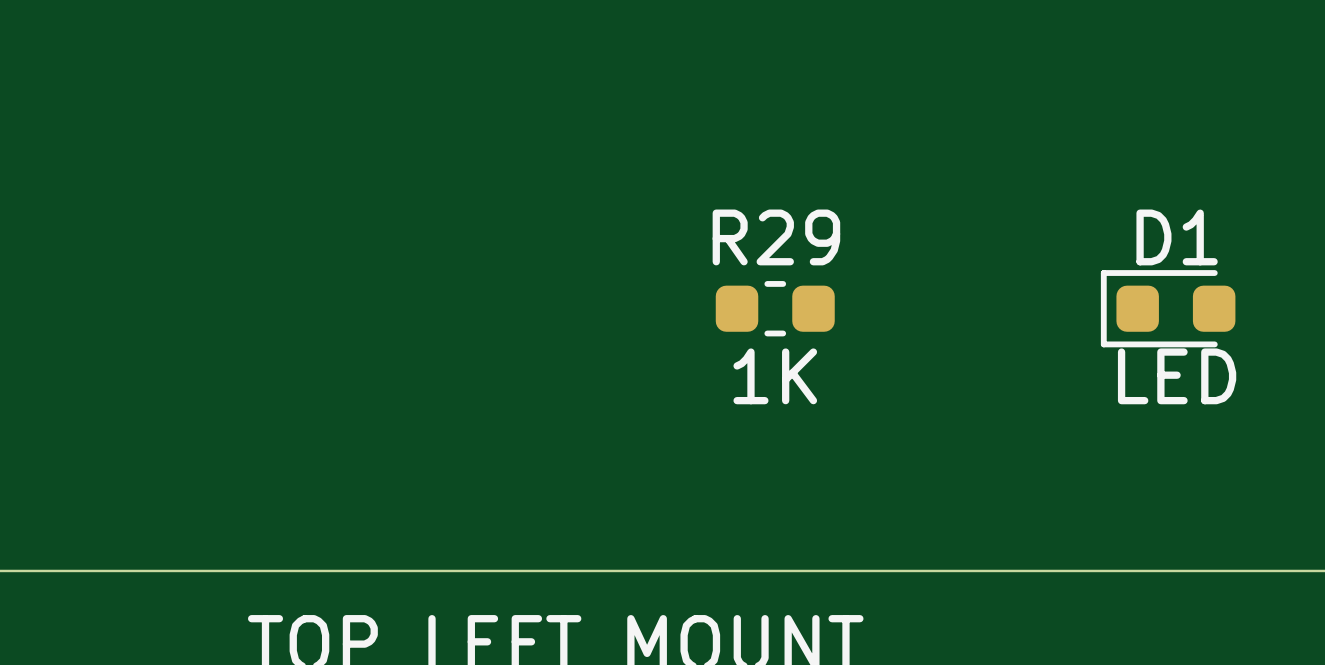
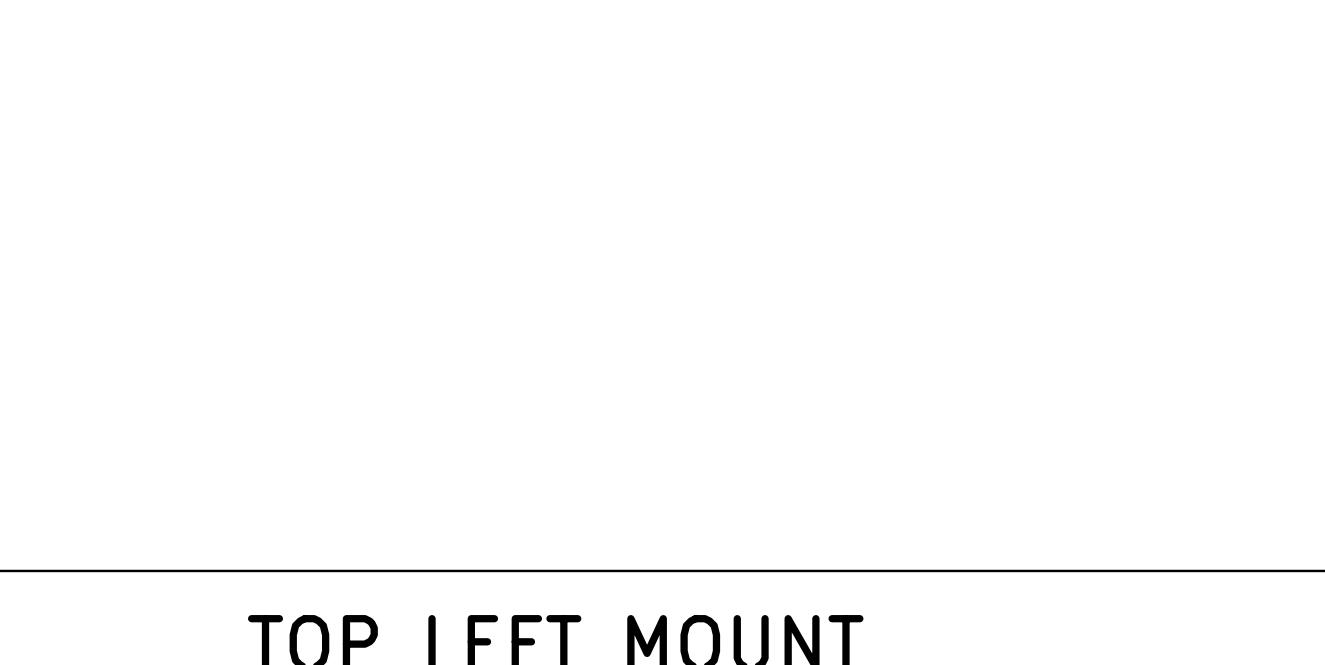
R29: 1K (775, 308) -> none
D1: LED (1168, 308) -> none

